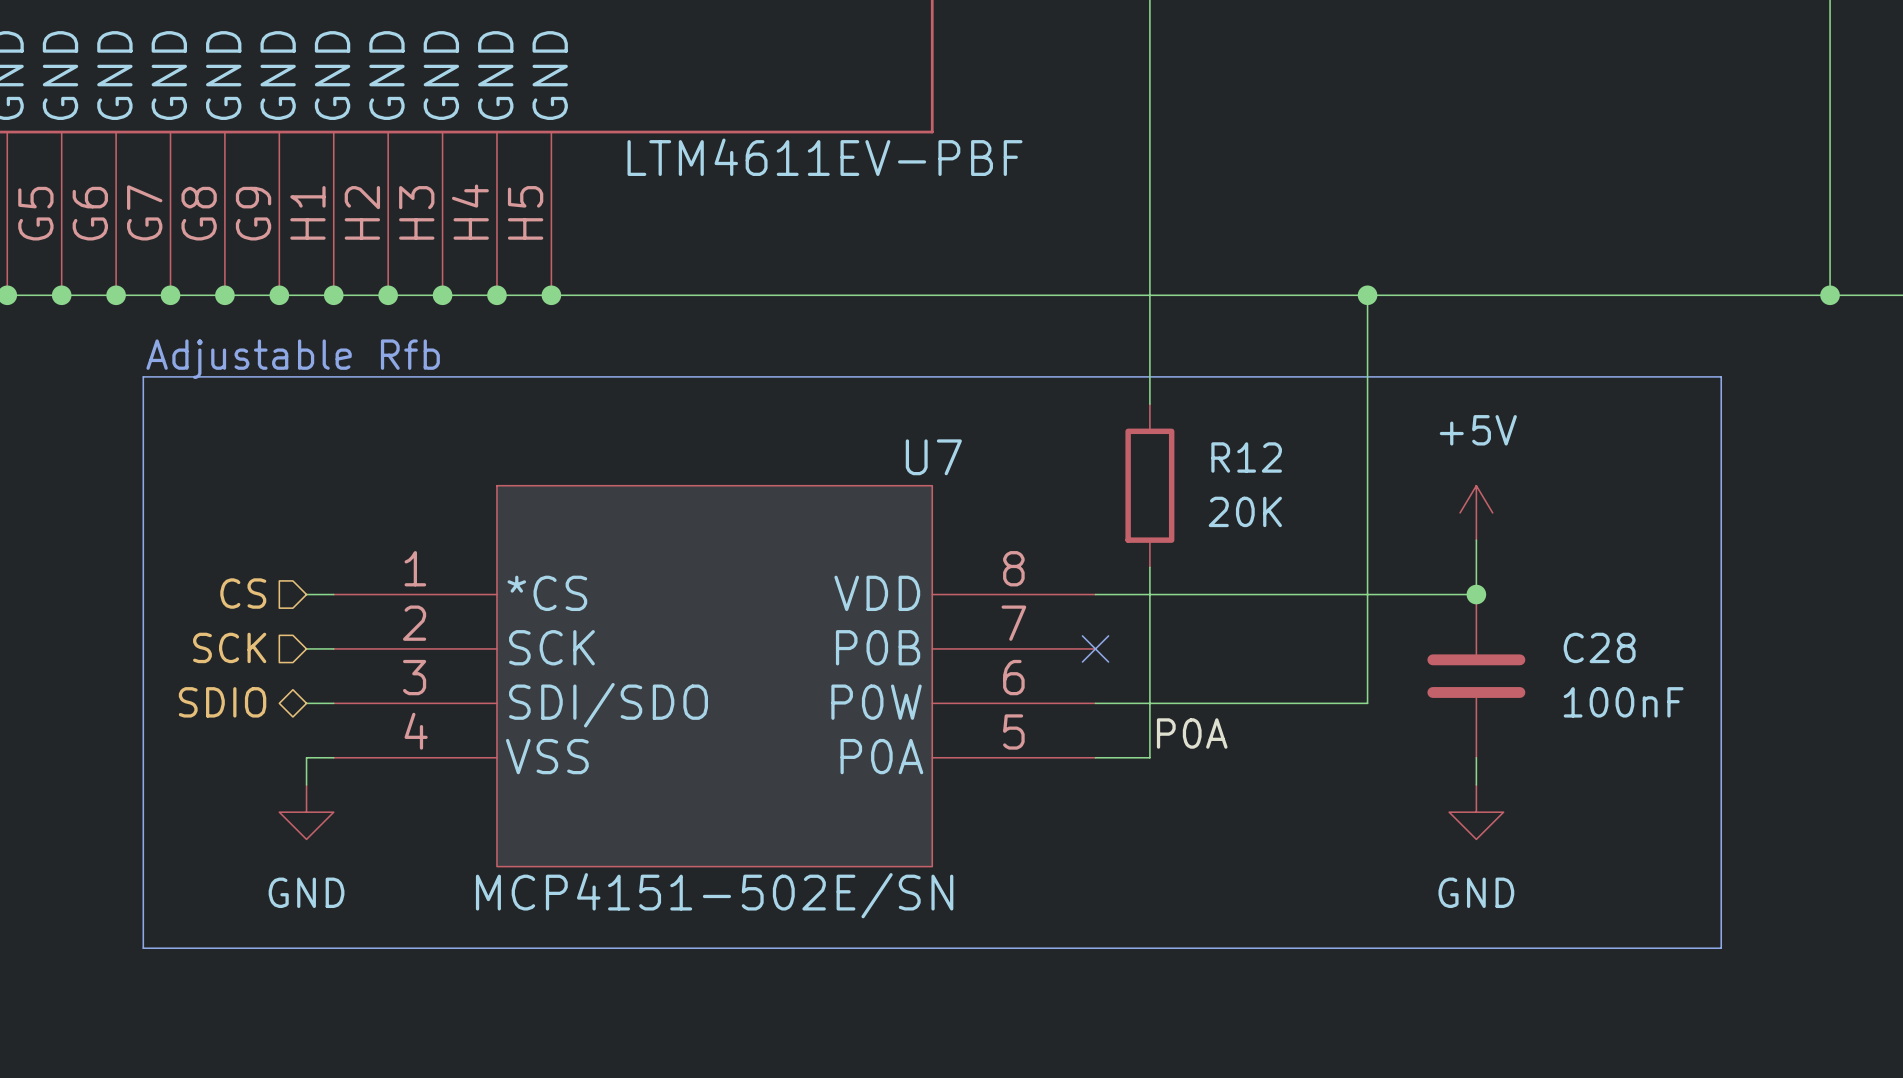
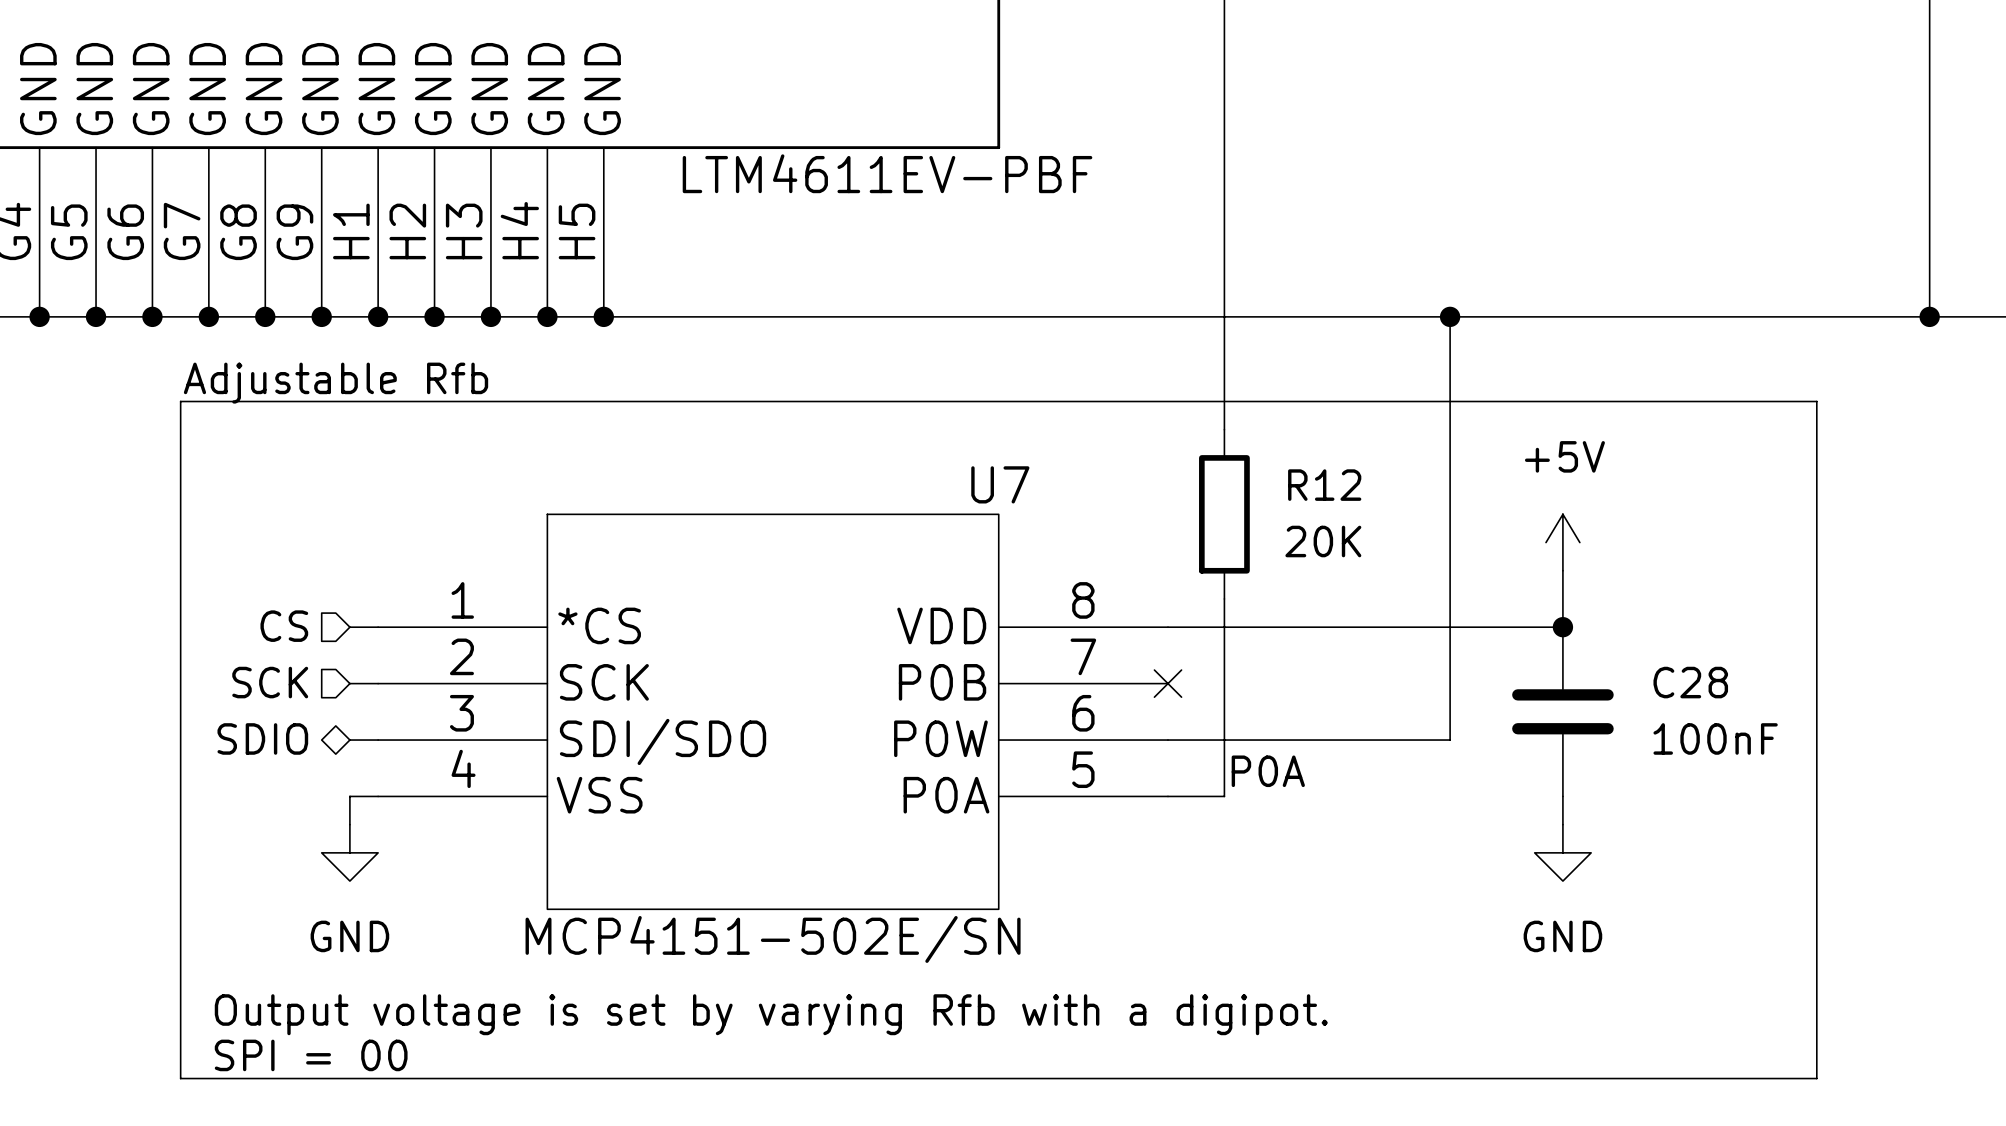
line: (143, 948) (1721, 948) -> (180, 993) (180, 1078) (1816, 1078) (1816, 993)
text: none -> Output voltage is set by varying Rfb with a digipot. (771, 1014)
text: none -> SPI = 00 (311, 1055)

